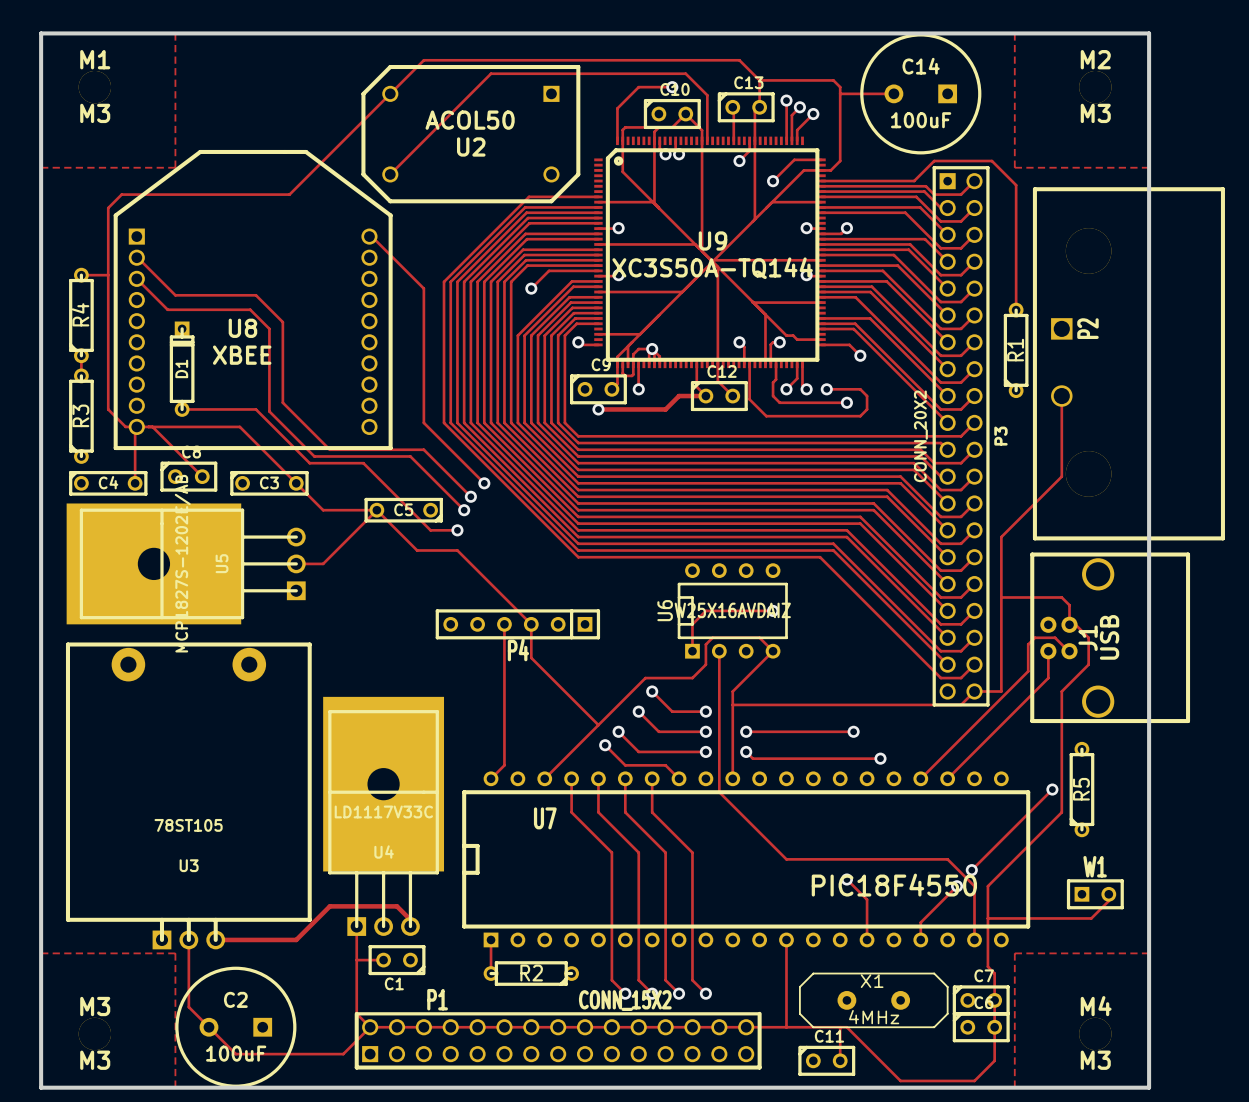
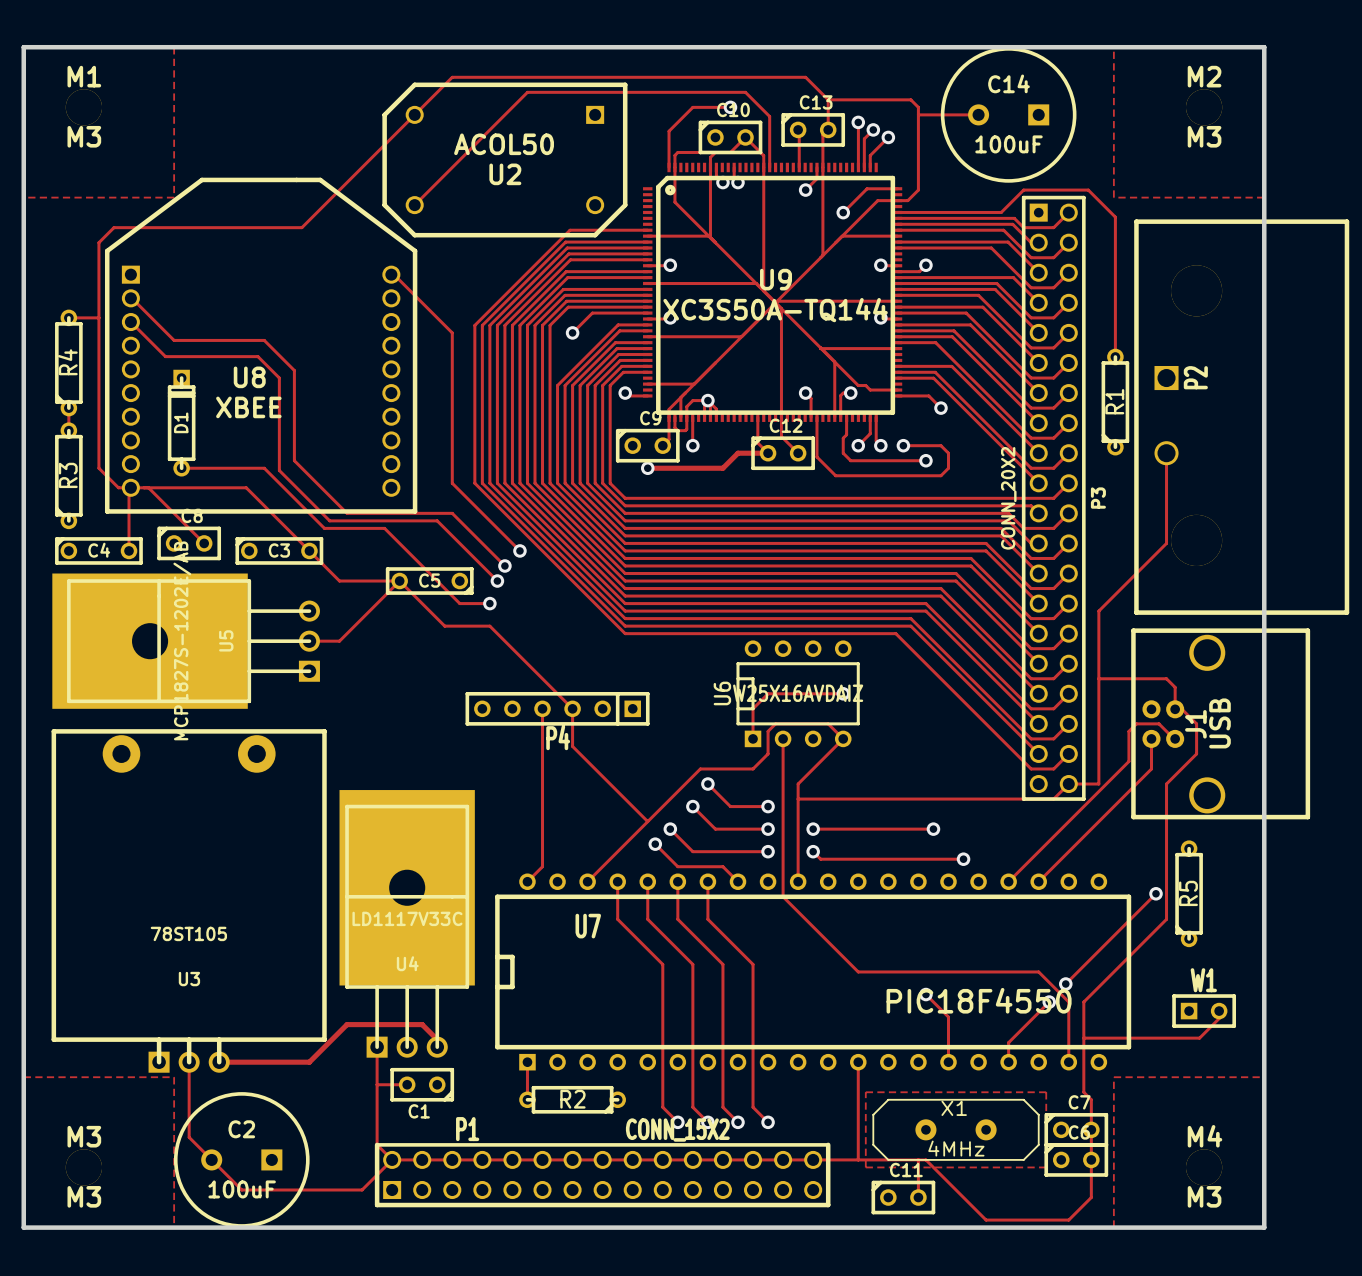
zone outline: none -> (865, 1092) (865, 1167) (1046, 1167) (1046, 1092) (865, 1092)

